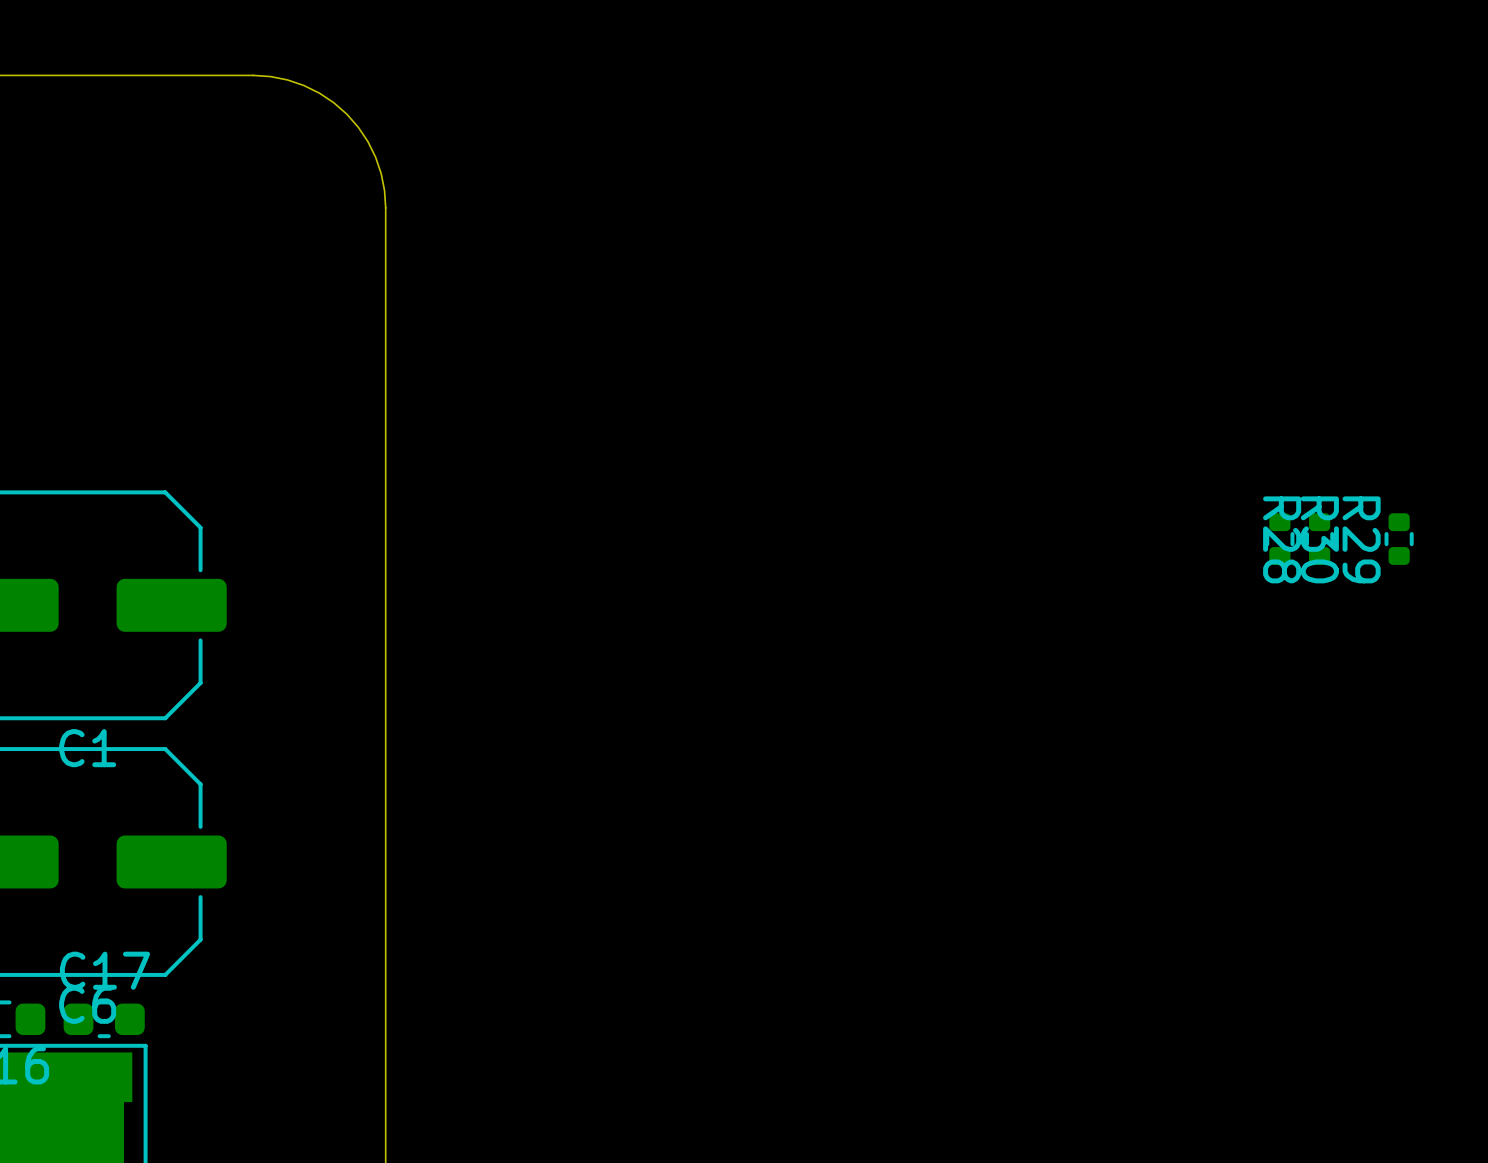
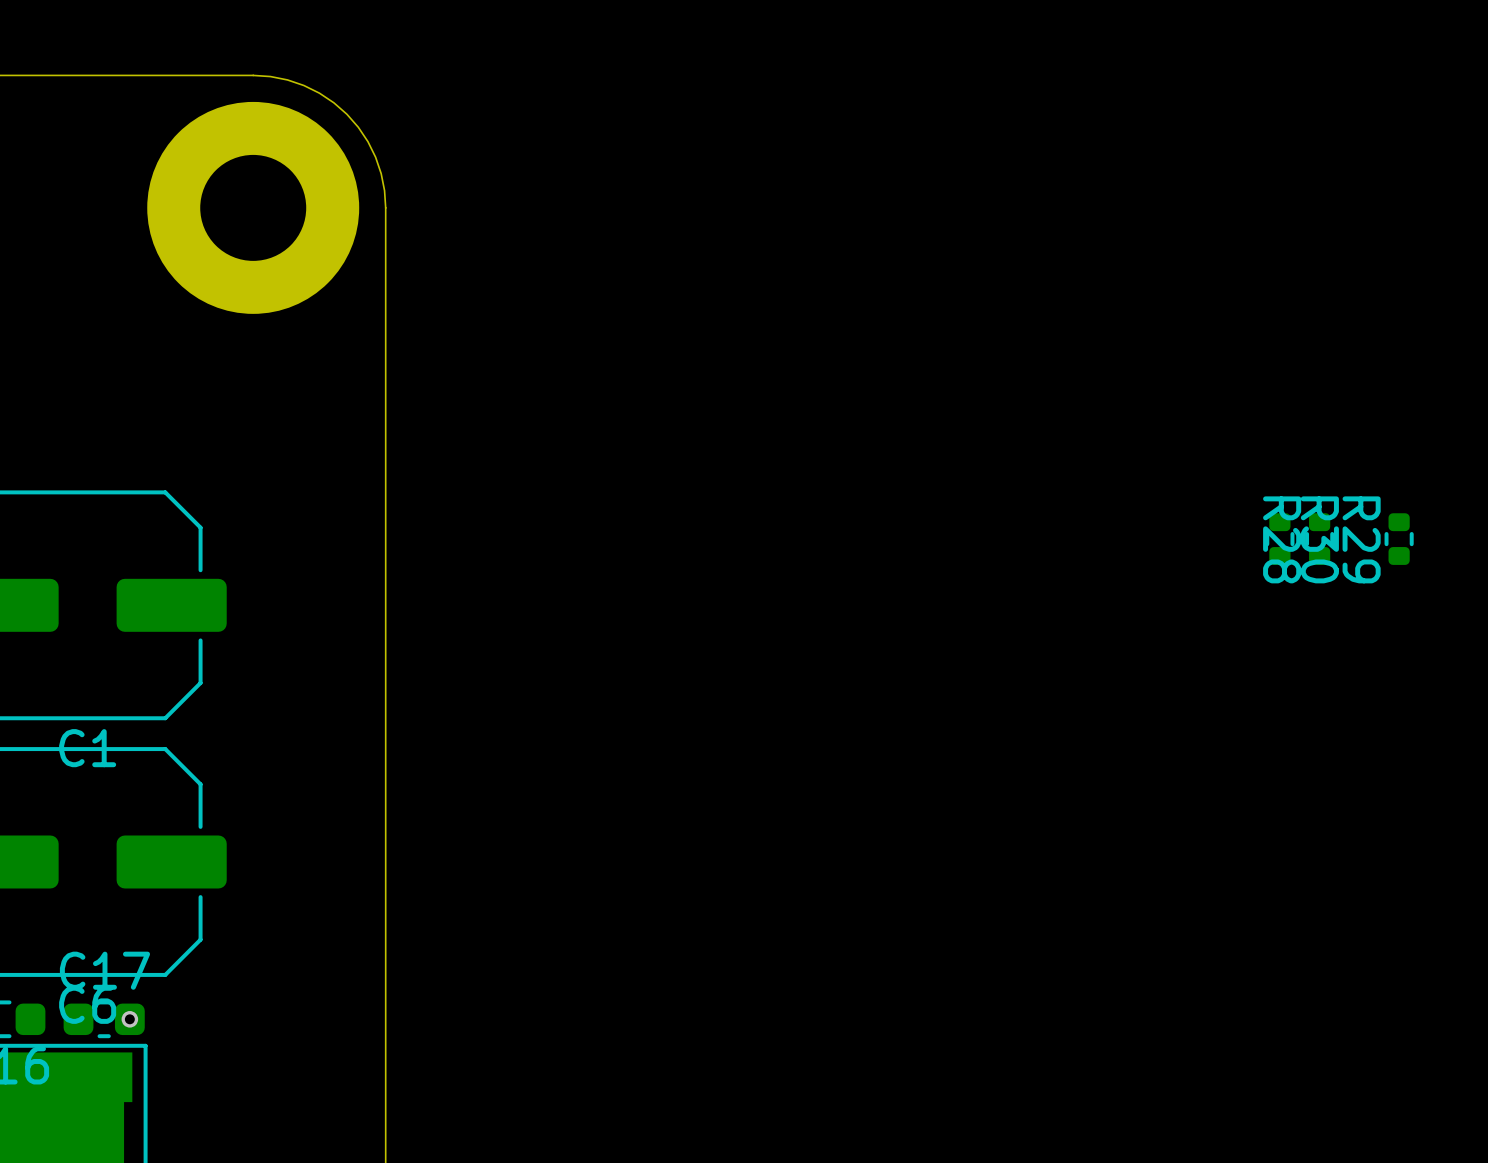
part: none -> (253, 207)
via: none -> (129, 1019)

